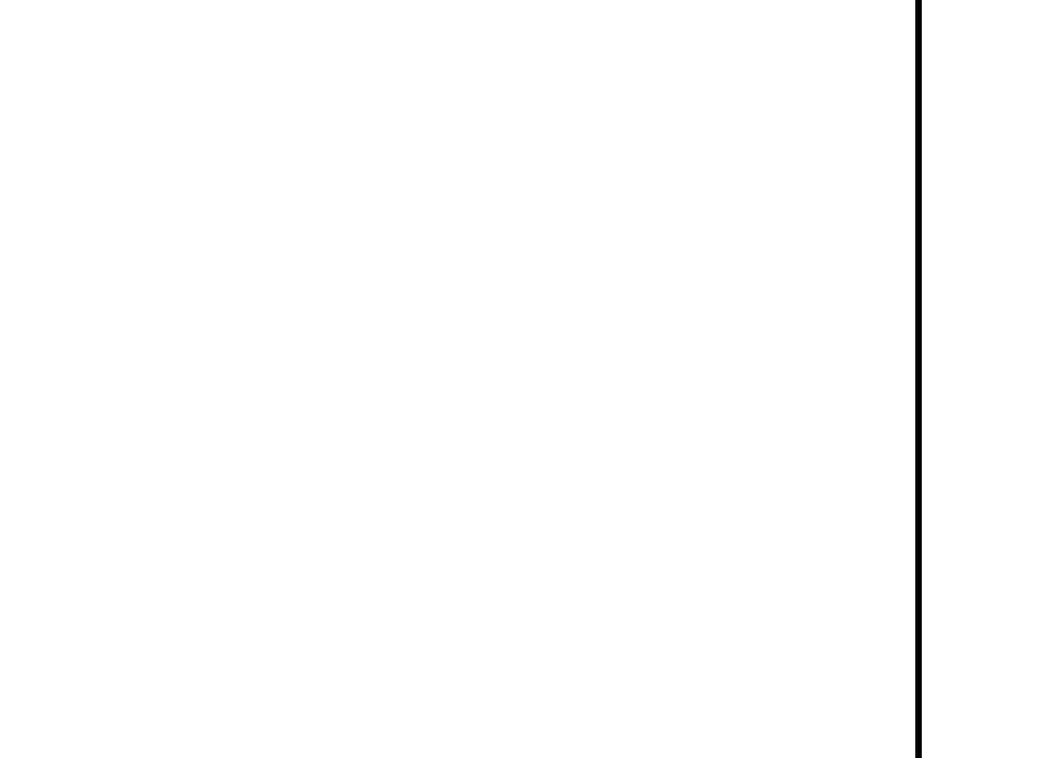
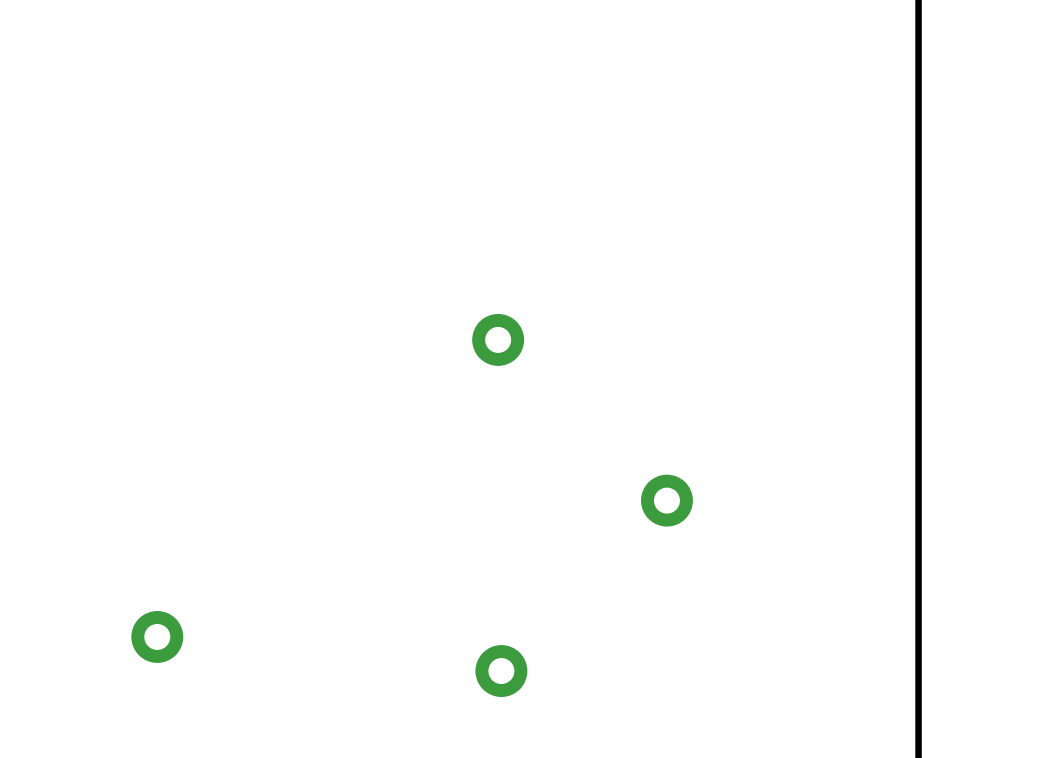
via: none -> (498, 339)
via: none -> (666, 500)
via: none -> (157, 636)
via: none -> (501, 671)

